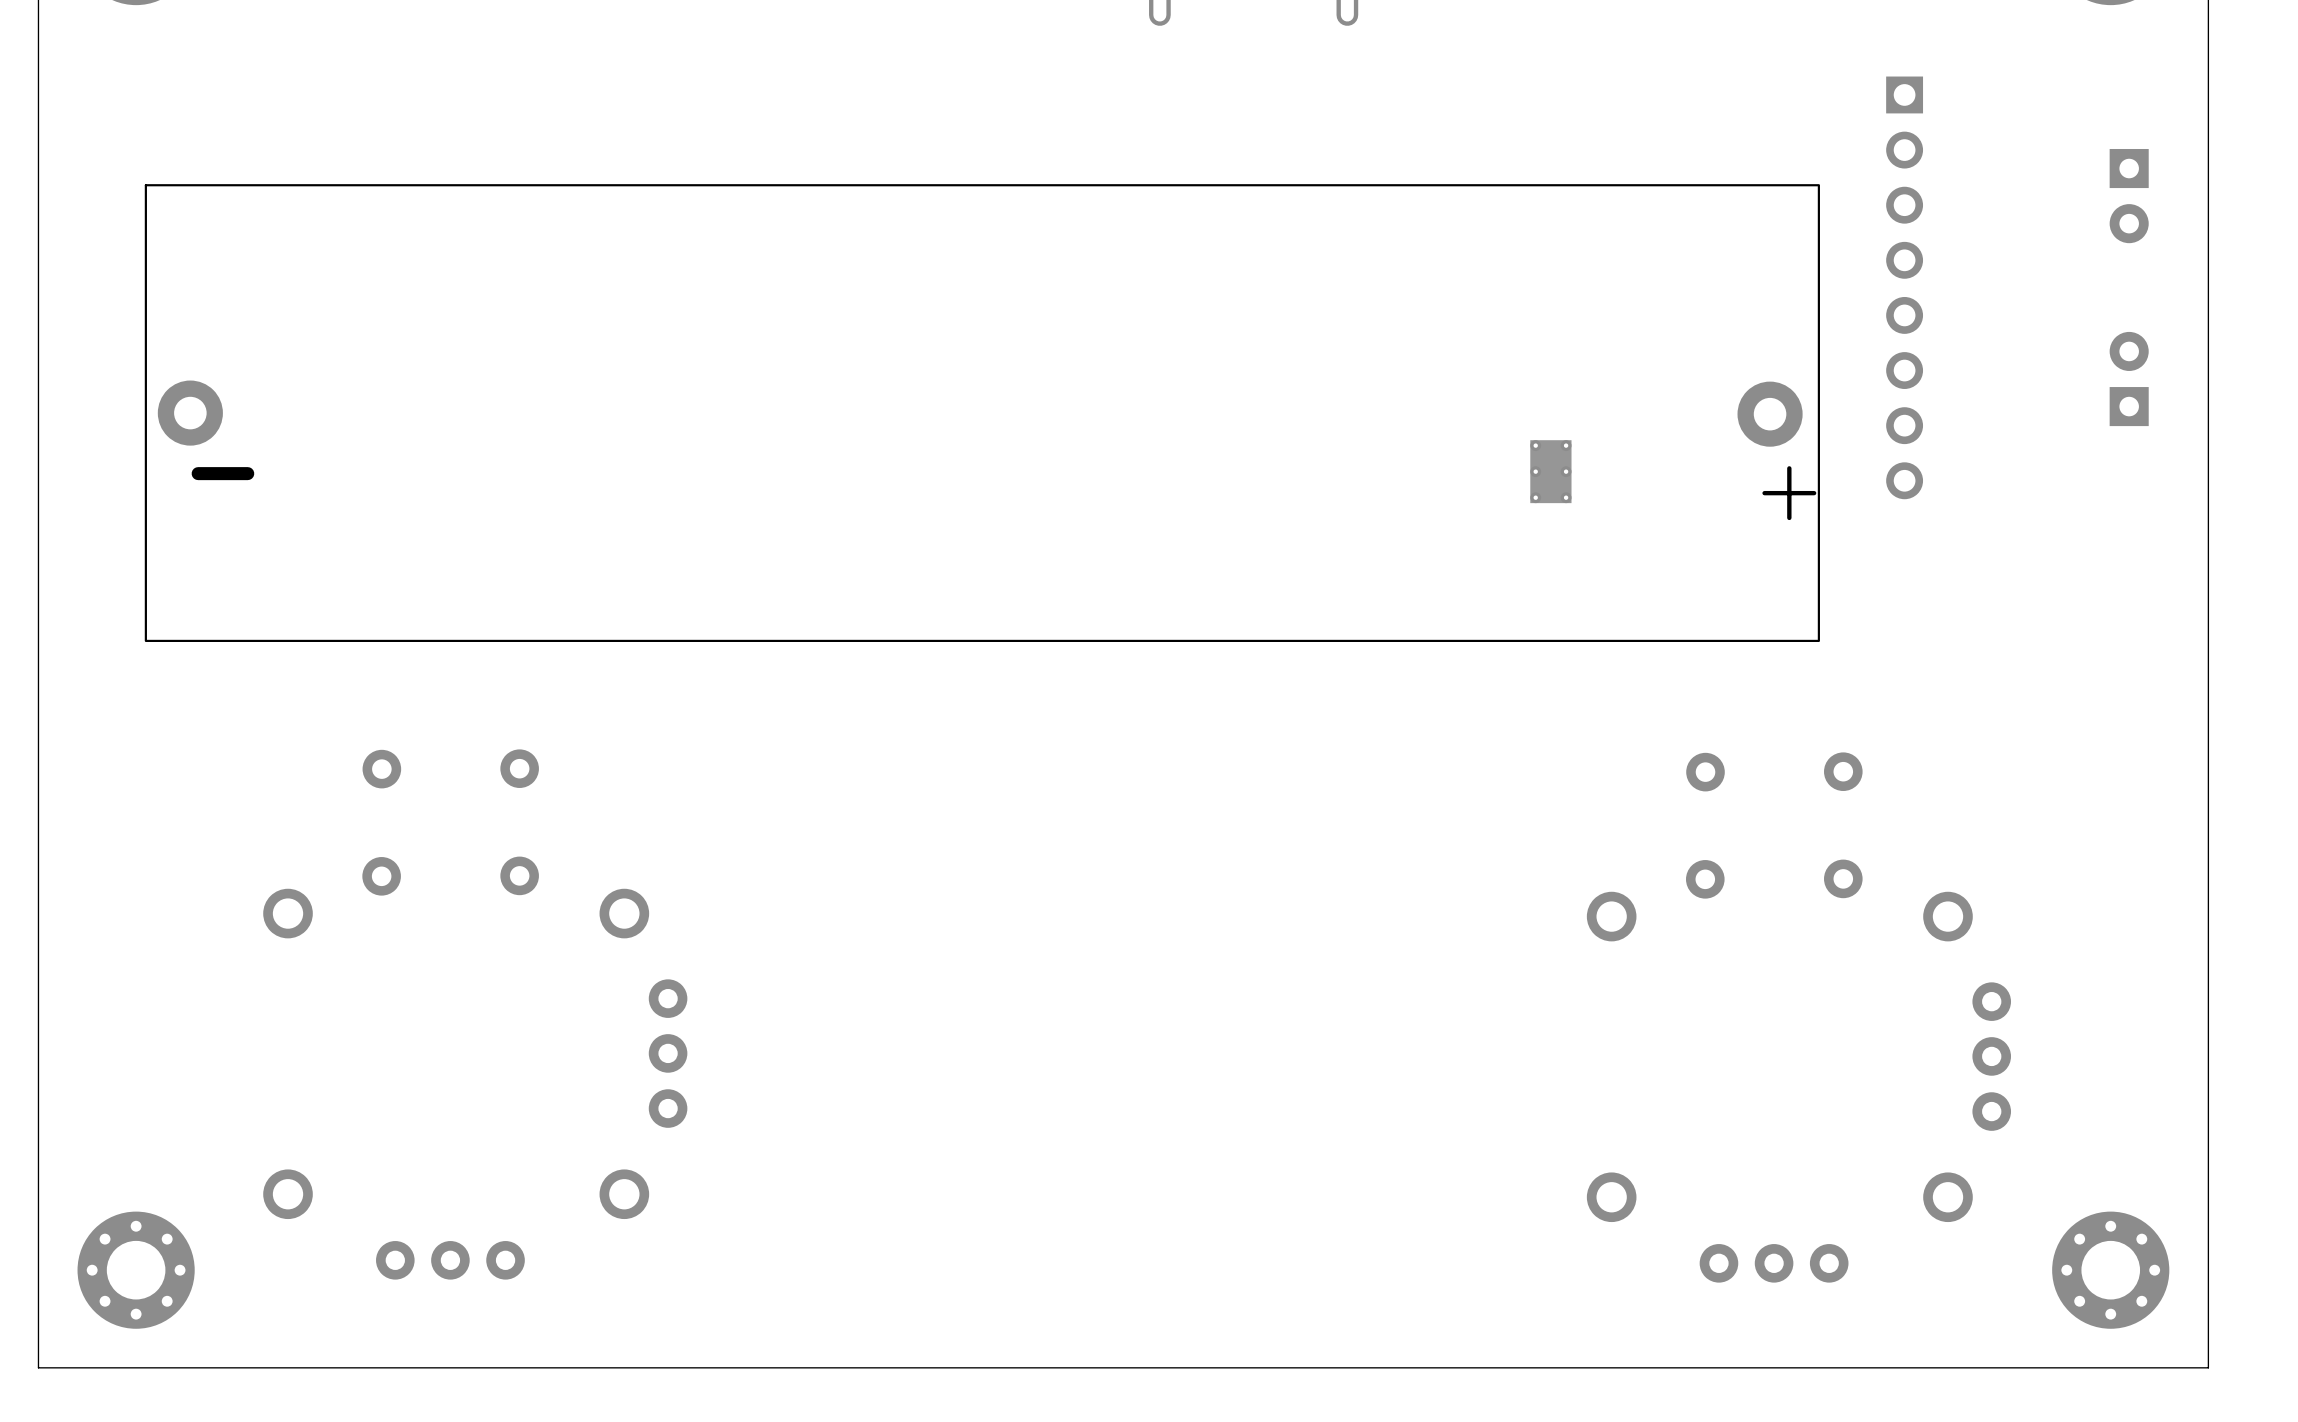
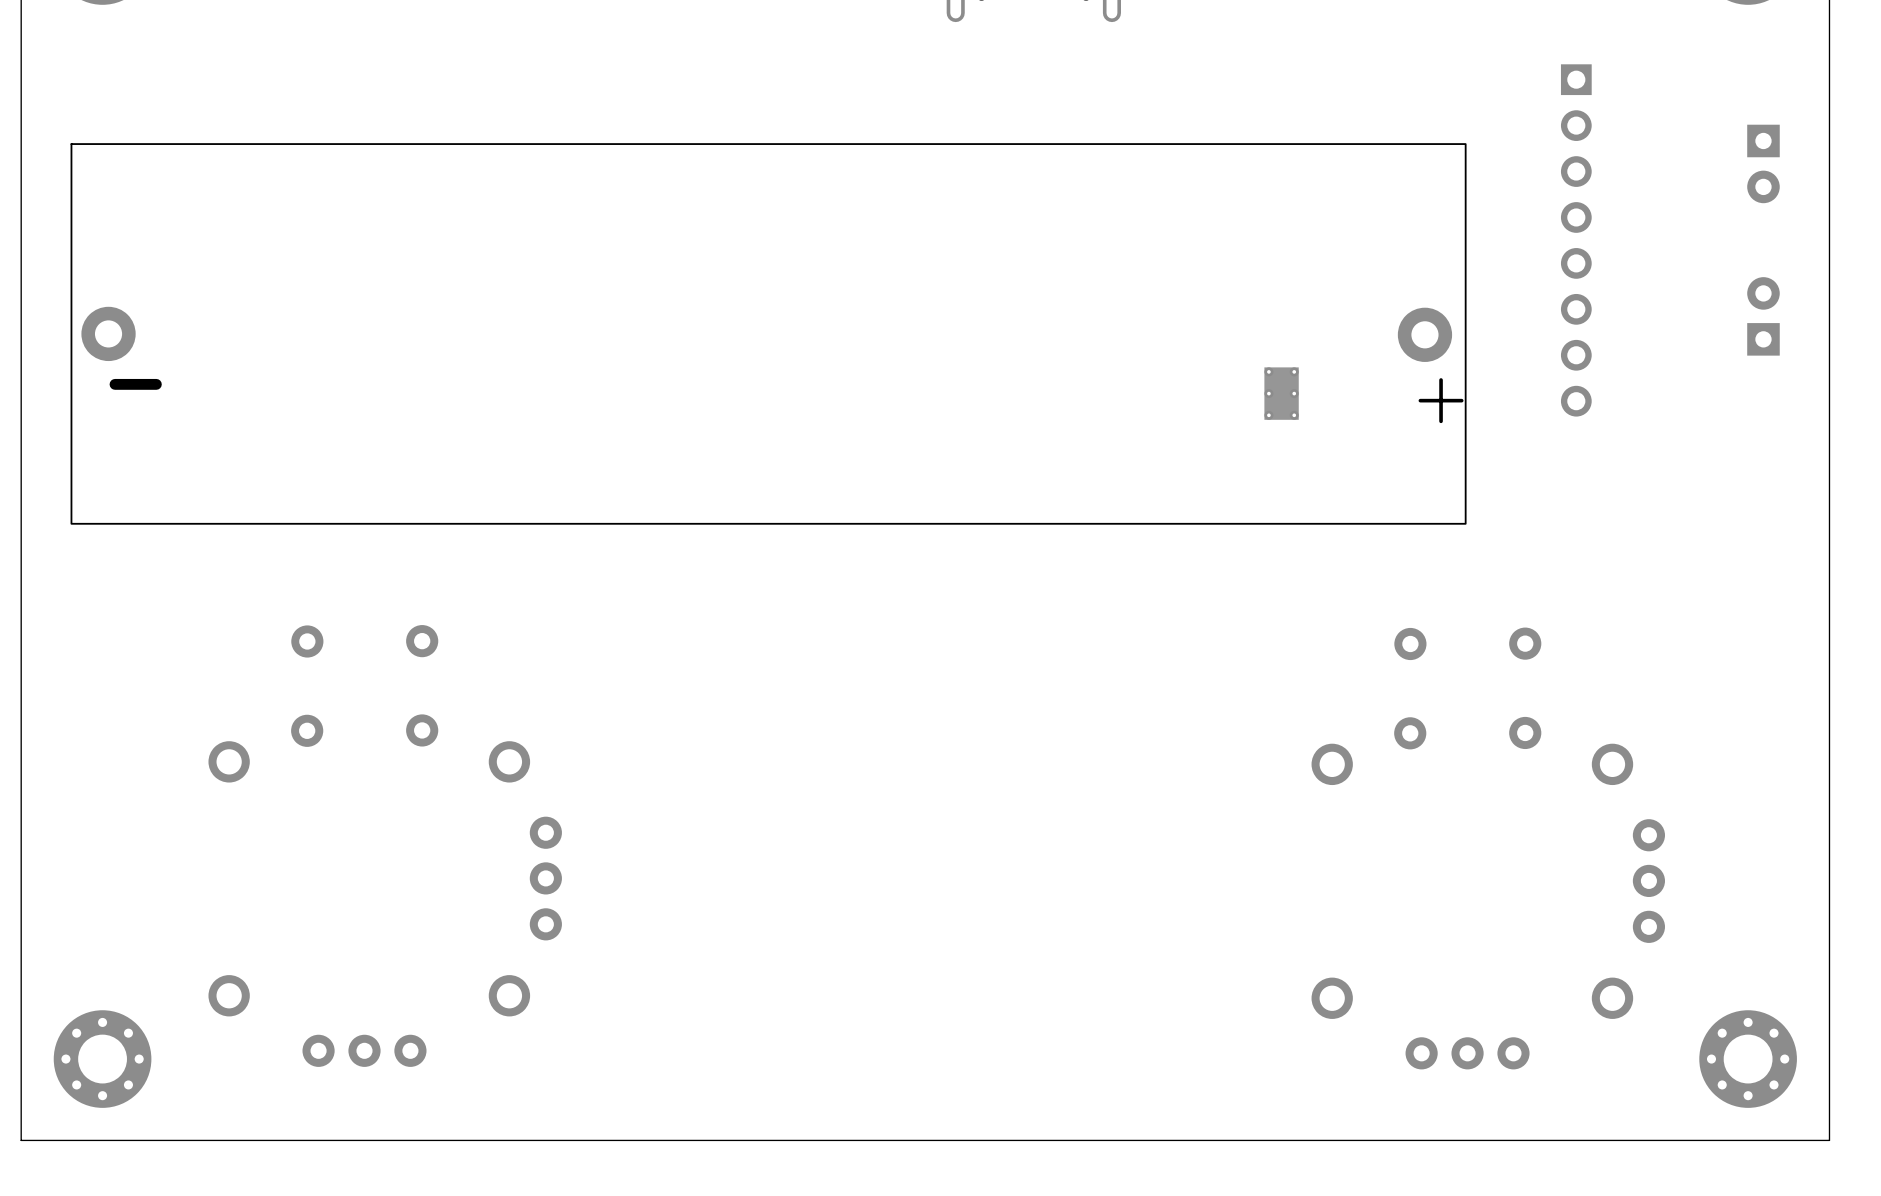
part position: (982, 413) -> (768, 333)

